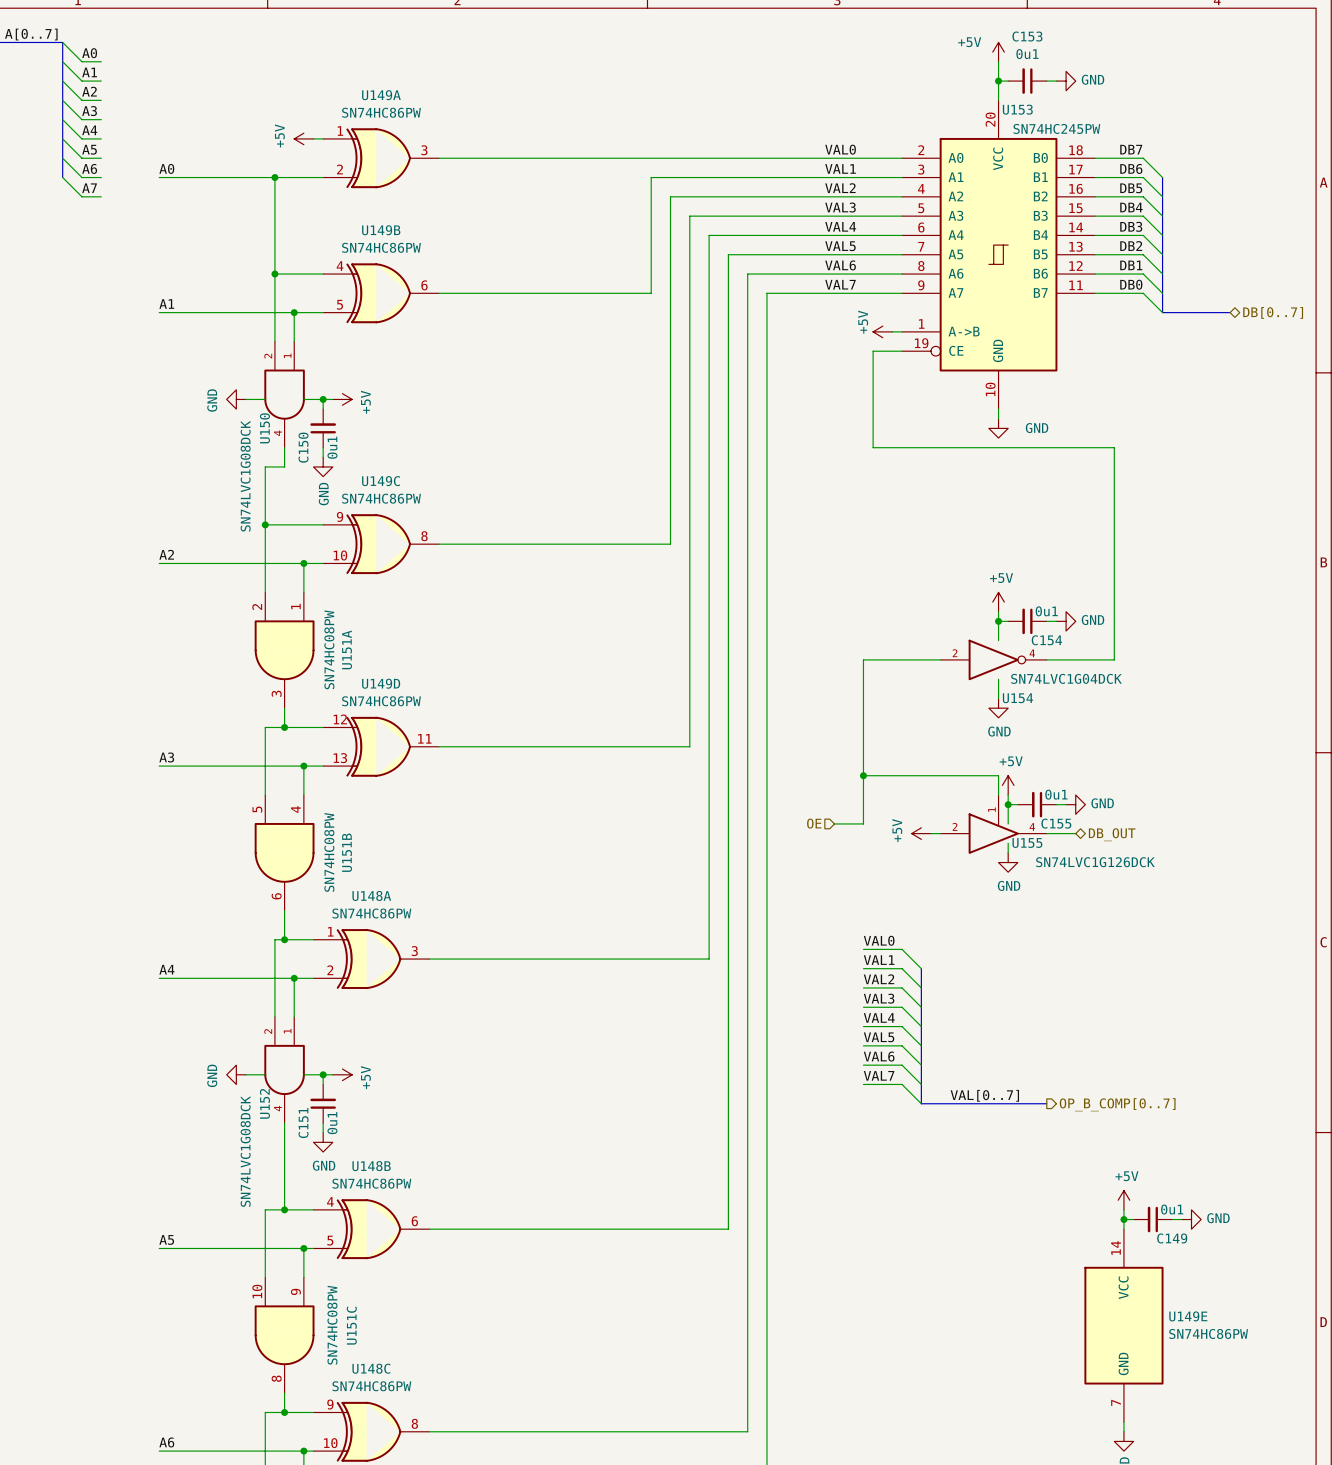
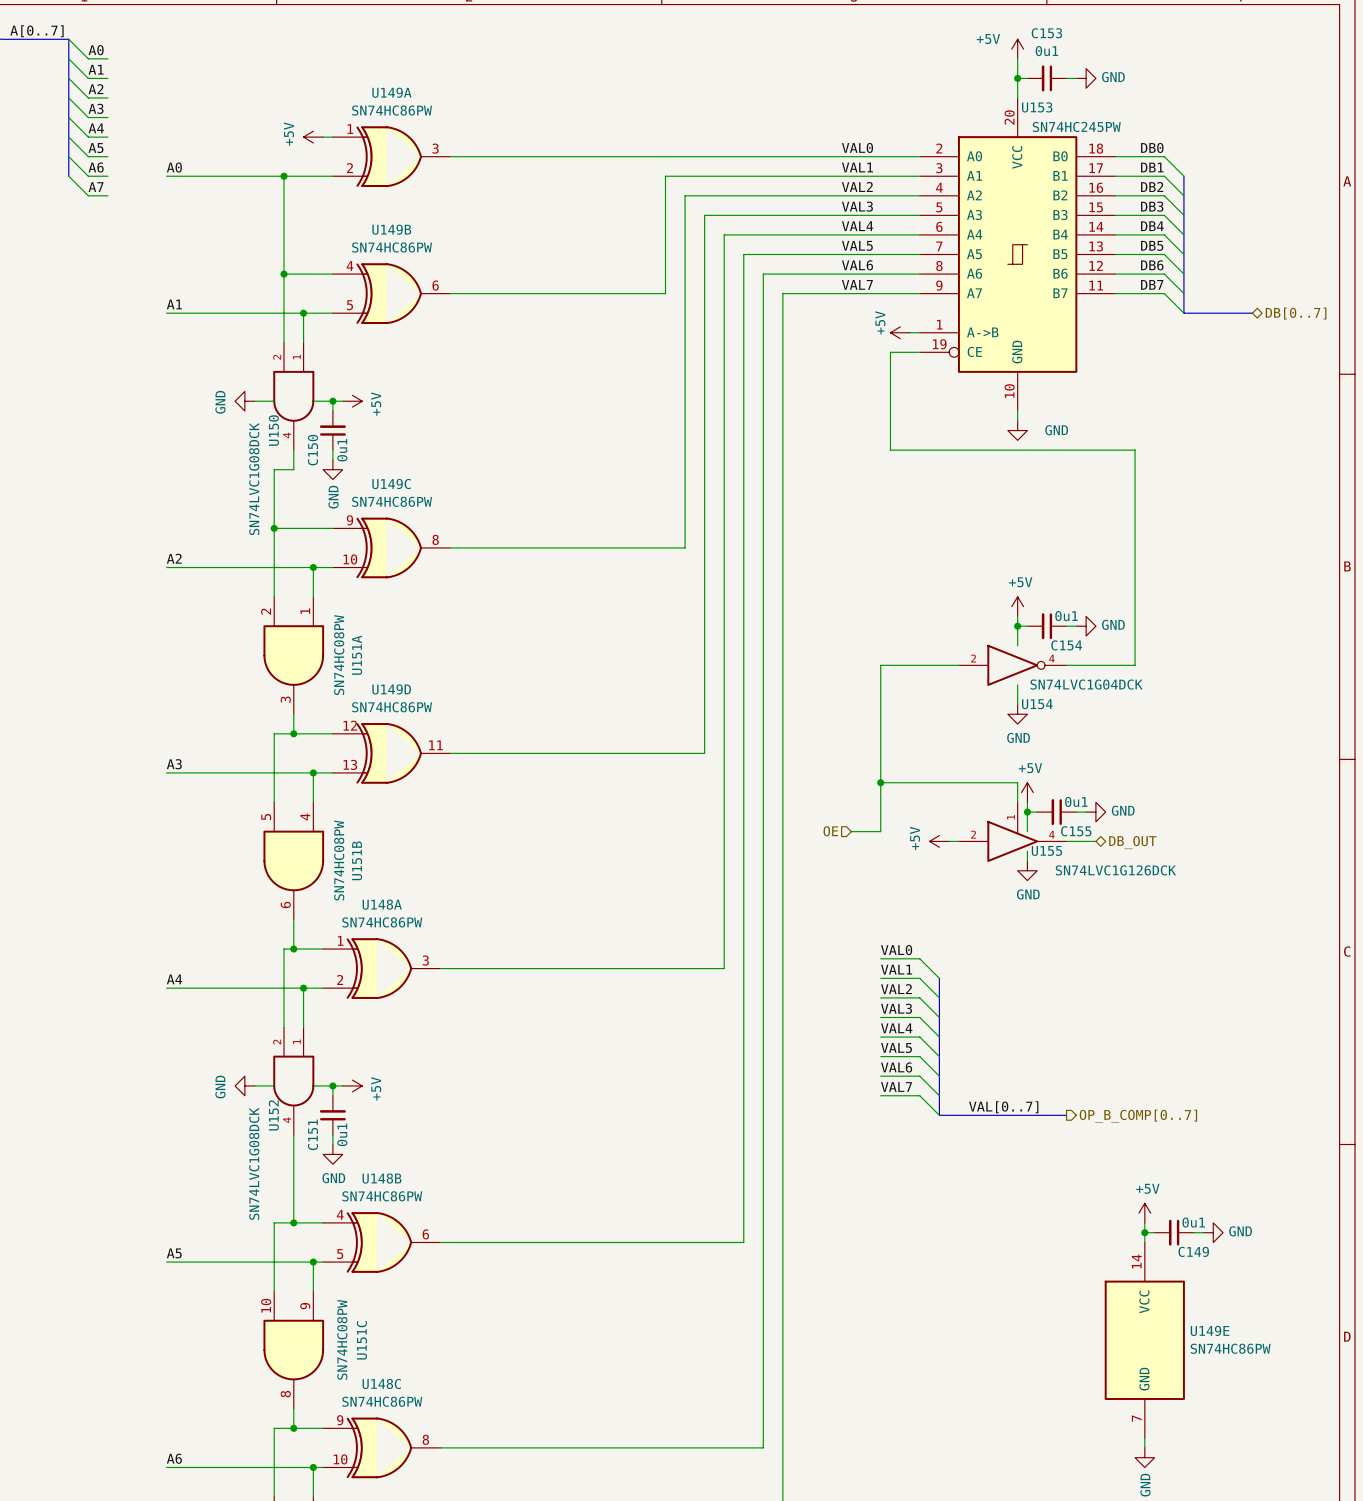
label: DB7 (1131, 149) -> DB0 (1152, 147)
label: DB6 (1131, 168) -> DB1 (1152, 167)
label: DB5 (1131, 188) -> DB2 (1152, 186)
label: DB4 (1131, 207) -> DB3 (1152, 206)
label: DB3 (1131, 226) -> DB4 (1152, 226)
label: DB2 (1131, 246) -> DB5 (1152, 245)
label: DB1 (1131, 265) -> DB6 (1152, 265)
label: DB0 (1131, 284) -> DB7 (1152, 284)

